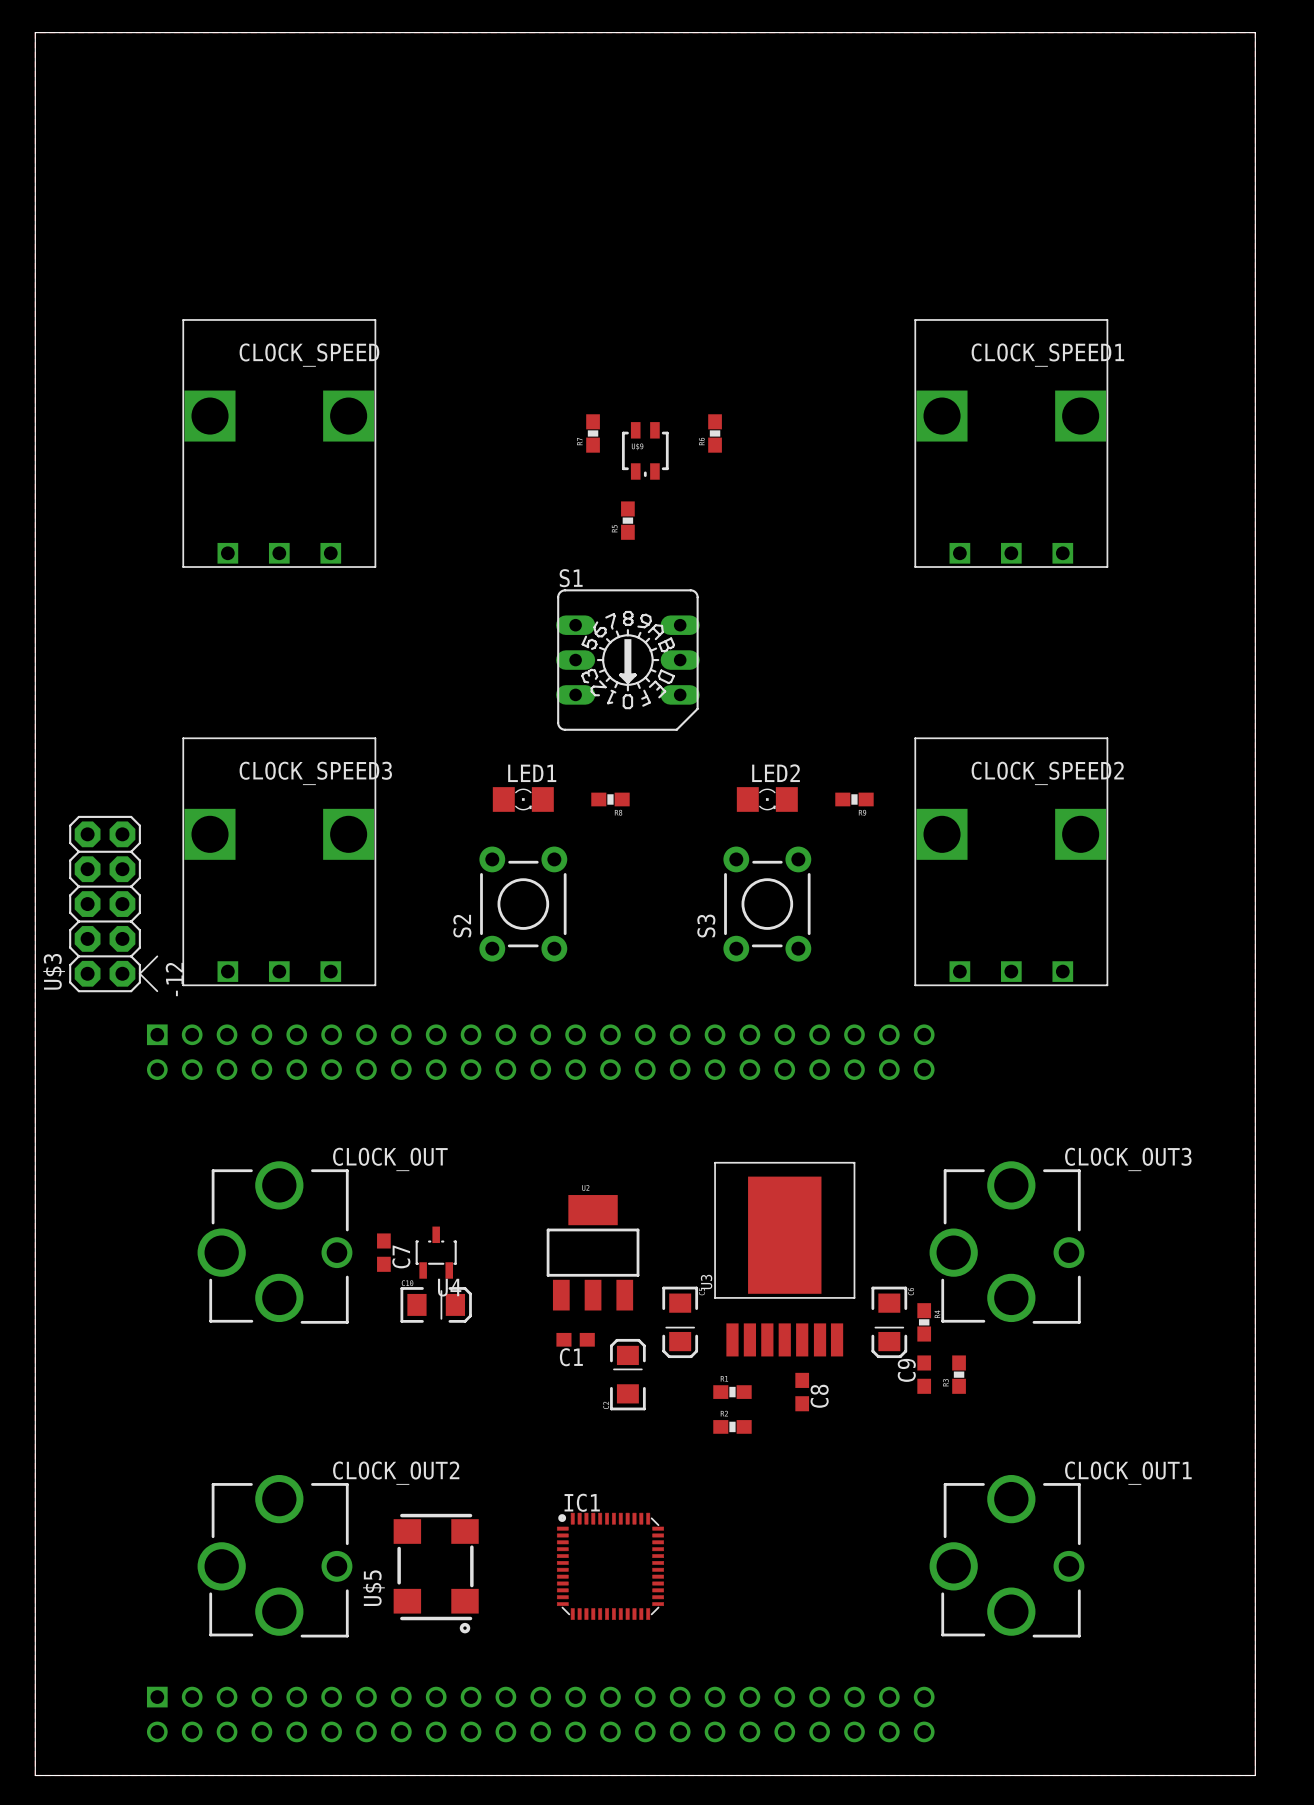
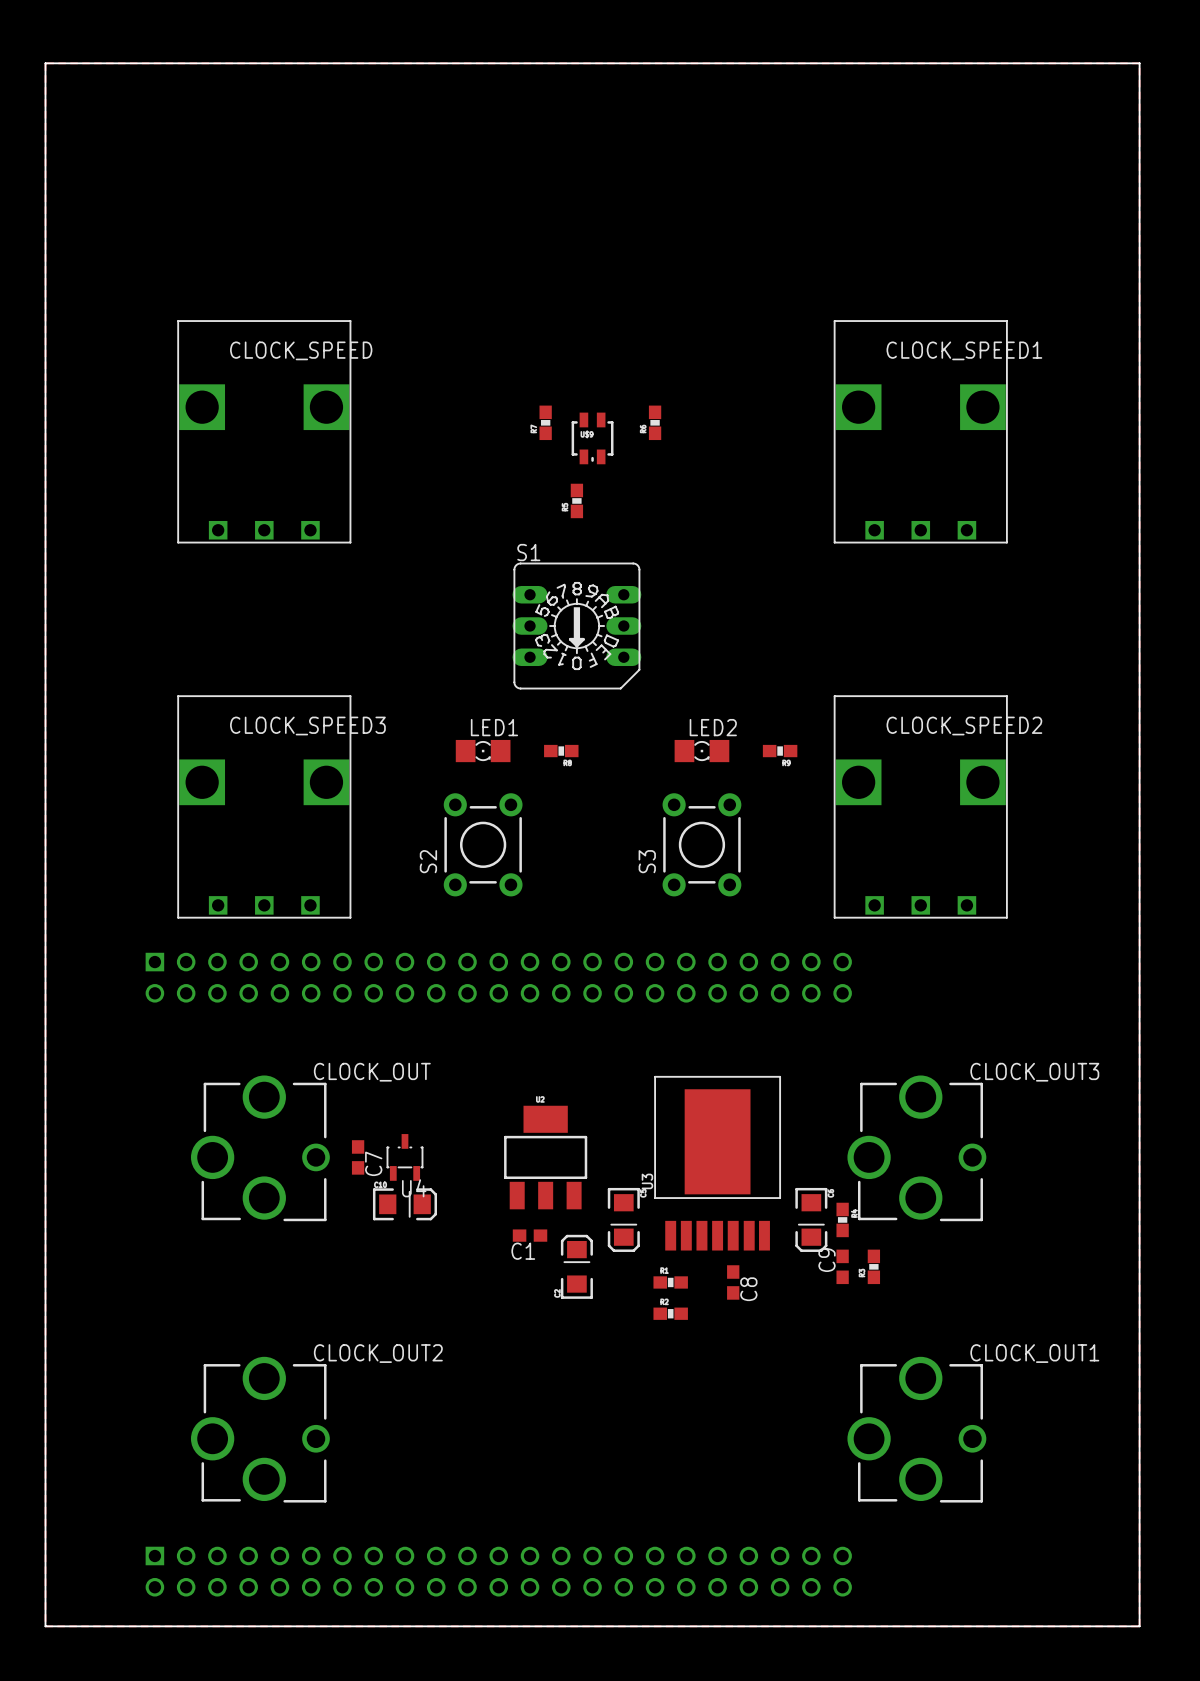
U$3: (113, 904) -> none
IC1: (610, 1566) -> none
U$5: (436, 1573) -> none

